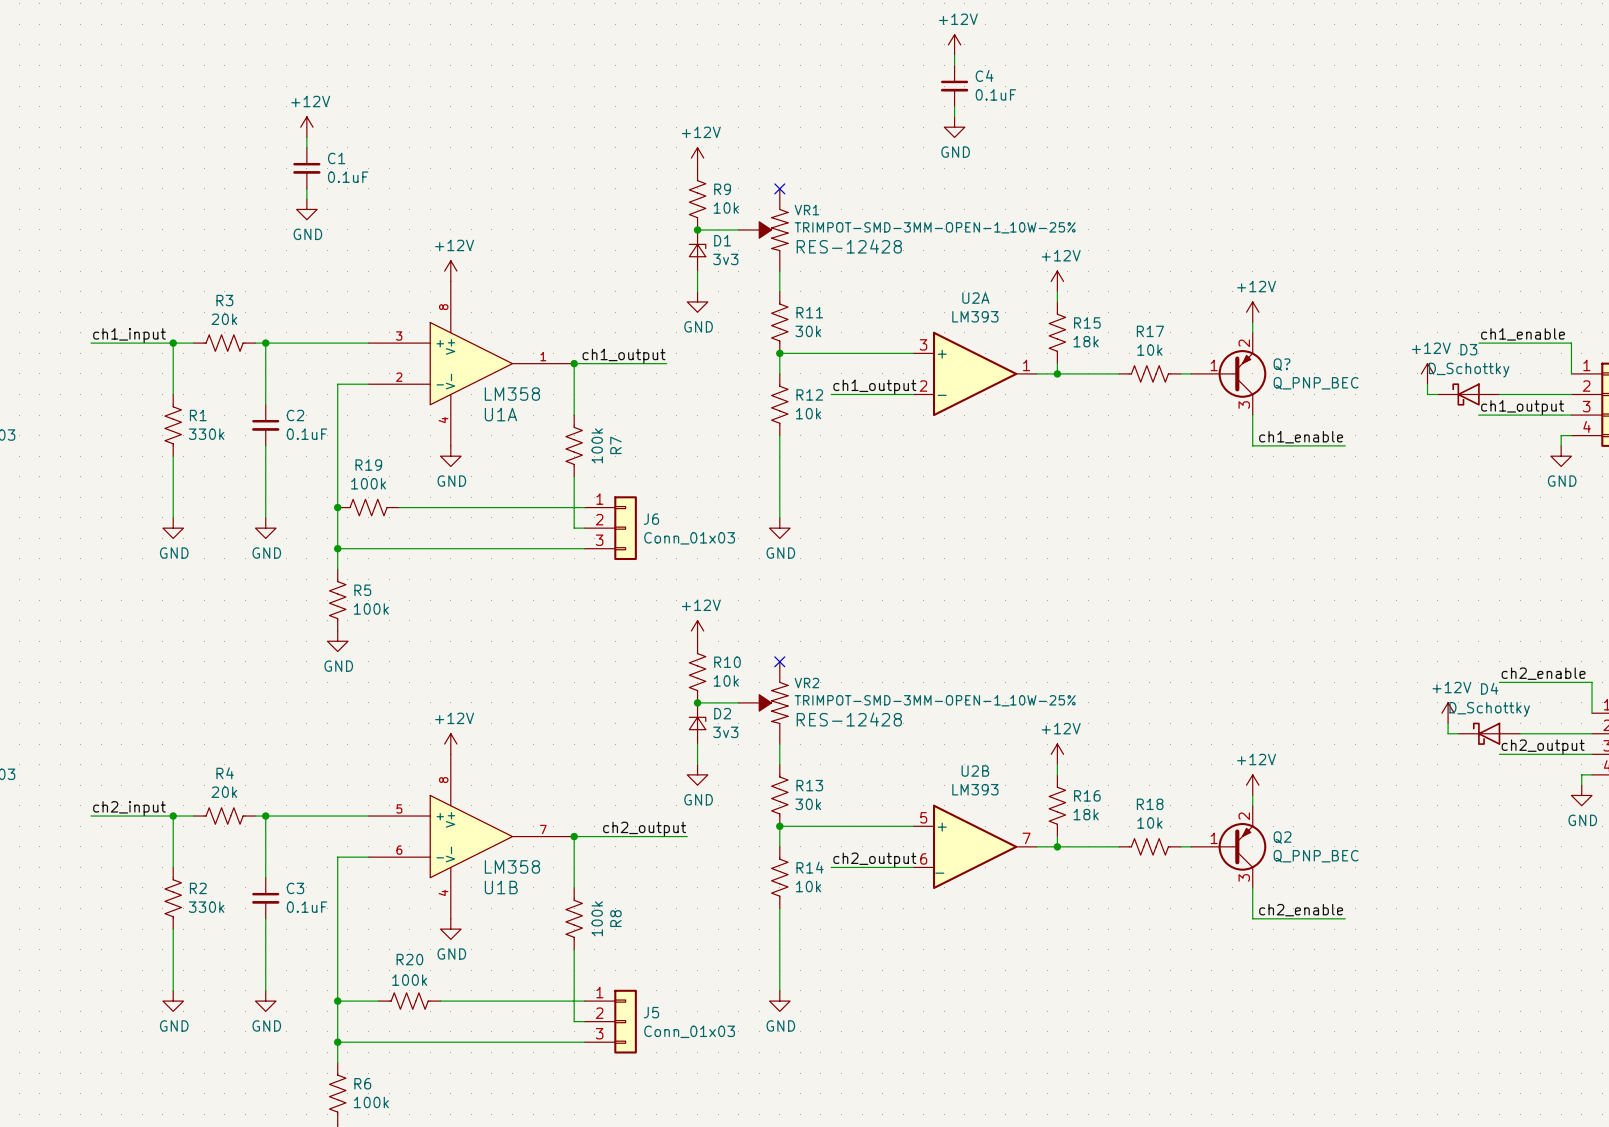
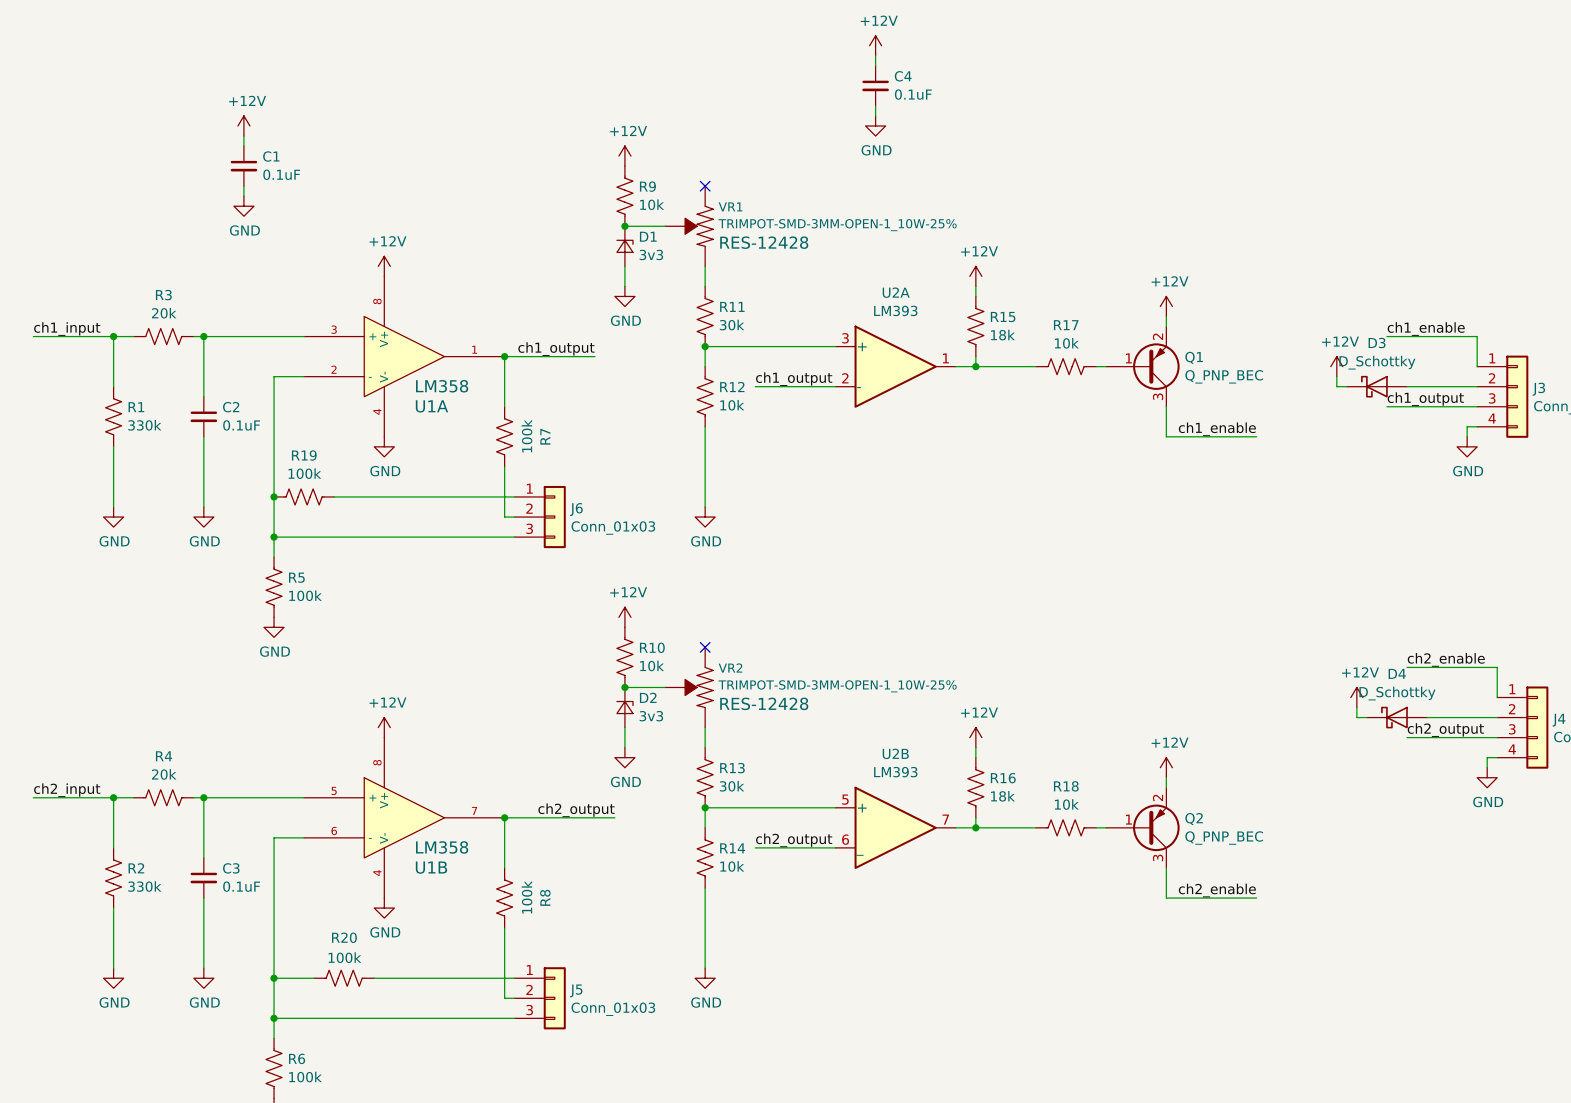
Q? name: Q? (1282, 364) -> Q1 (1194, 357)

